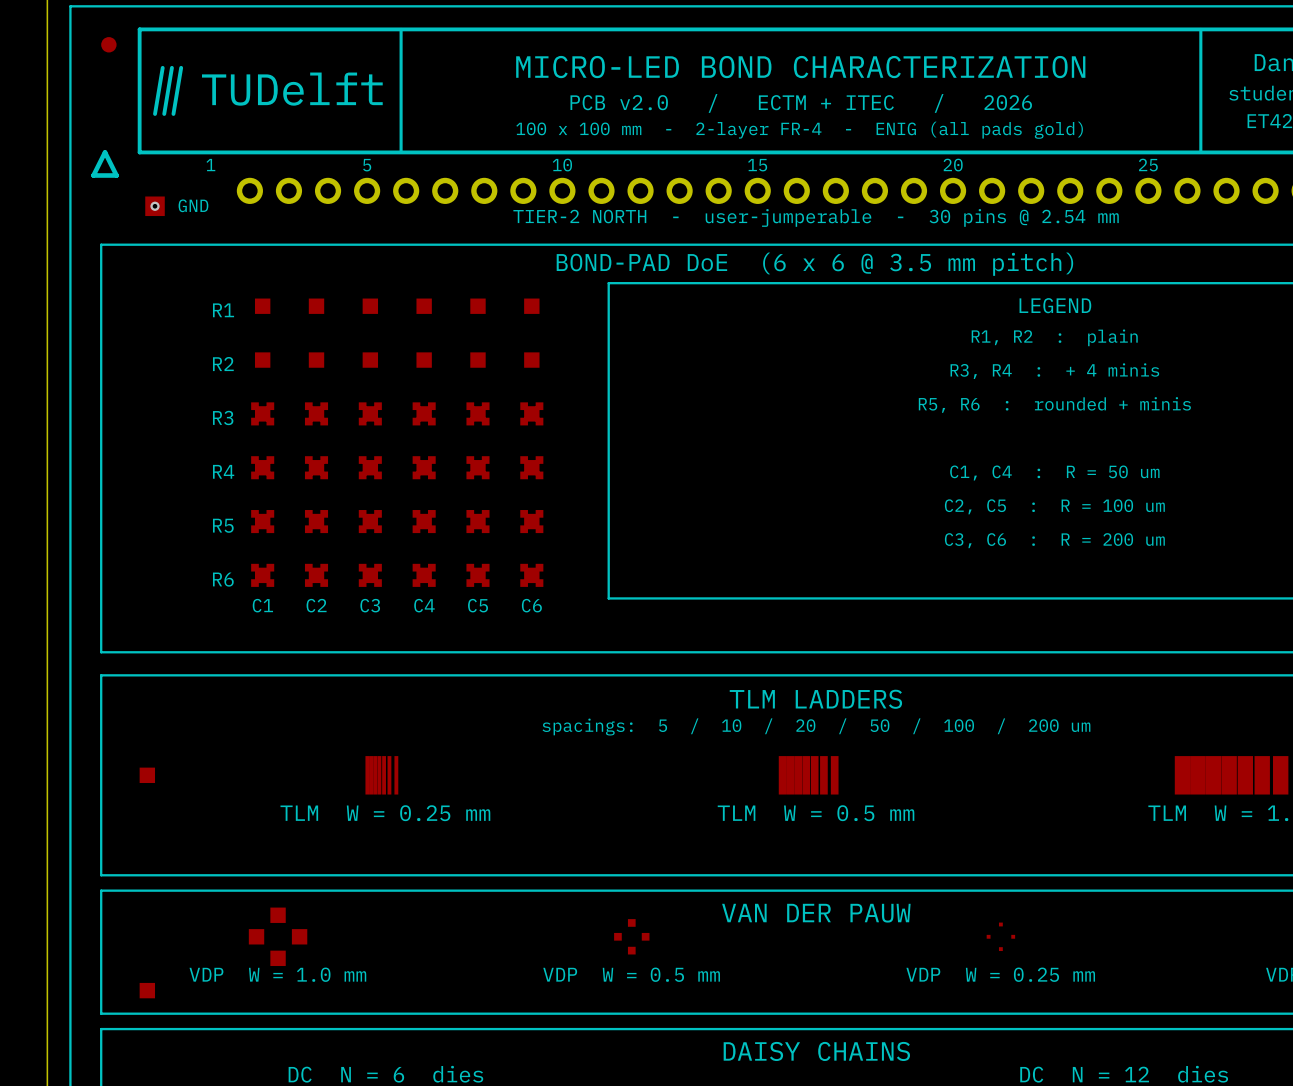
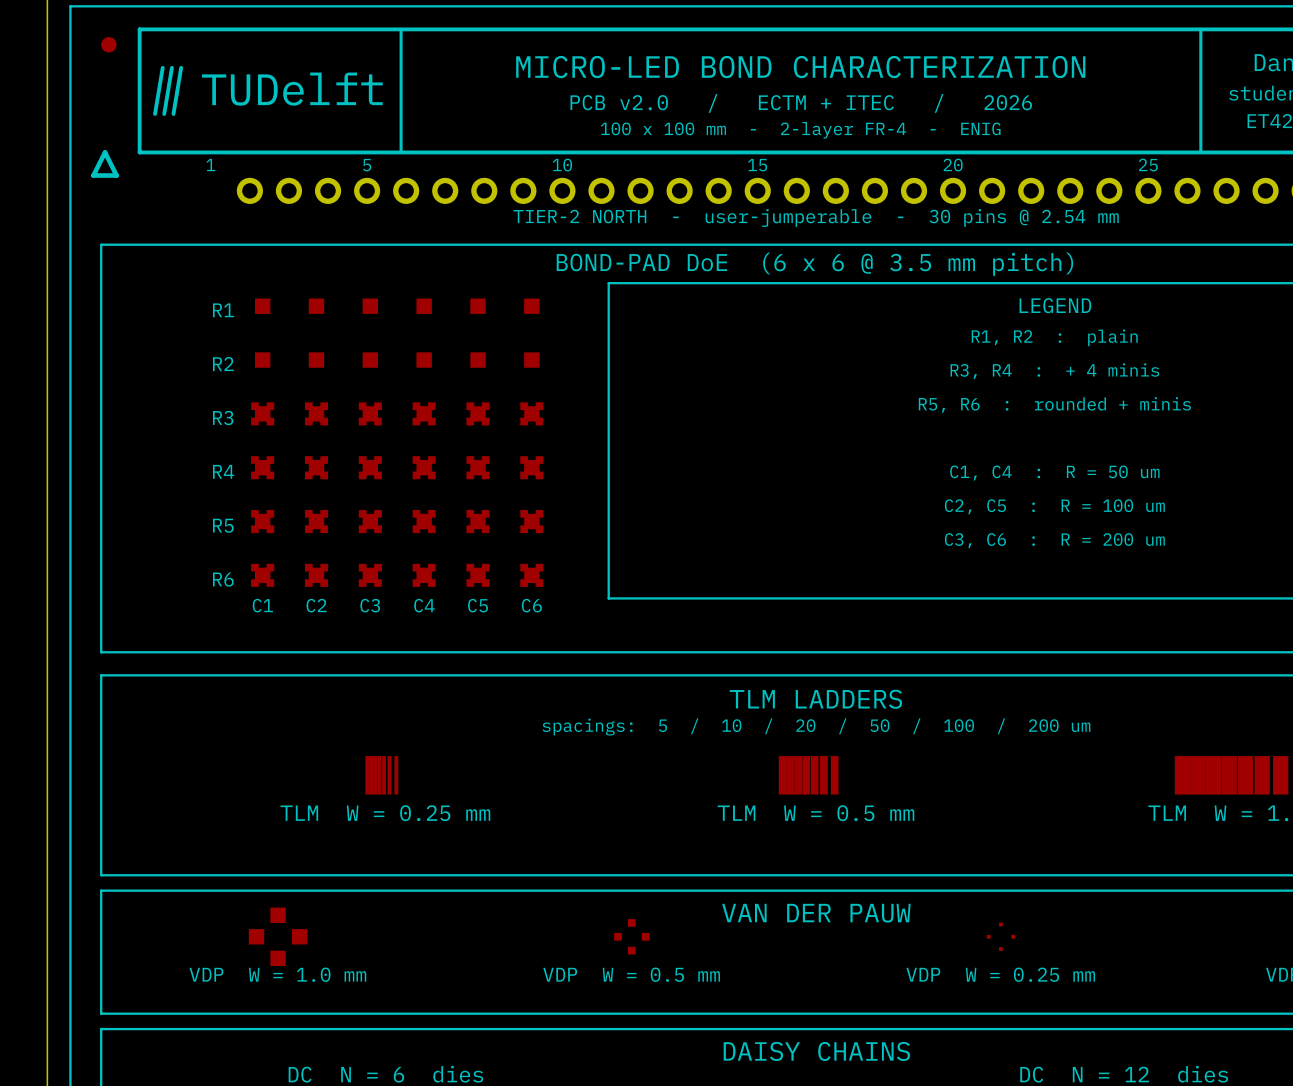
text: 100 x 100 mm - 2-layer FR-4 - ENIG (all pads gold) (799, 130) -> 100 x 100 mm - 2-layer FR-4 - ENIG (800, 130)
text: GND (193, 205) -> none
part: (155, 206) -> none
via: (155, 206) -> none
part: (147, 775) -> none
part: (147, 990) -> none

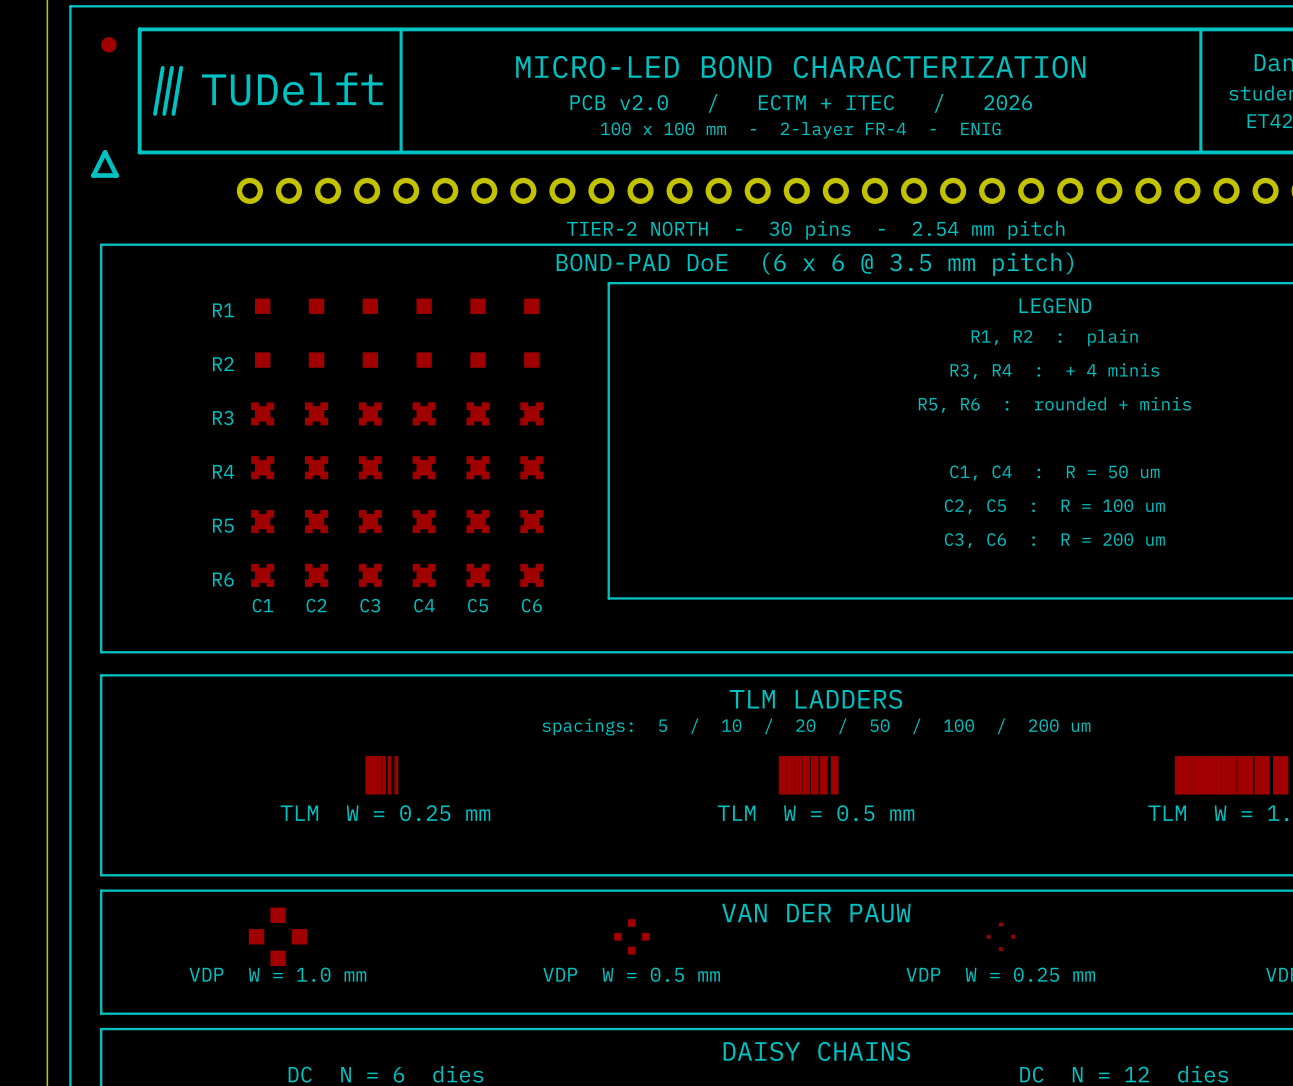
text: 1 (210, 165) -> none
text: 5 (367, 165) -> none
text: 10 (562, 165) -> none
text: 15 (757, 165) -> none
text: 20 (953, 165) -> none
text: 25 (1148, 165) -> none
text: TIER-2 NORTH - user-jumperable - 30 pins @ 2.54 mm (816, 217) -> TIER-2 NORTH - 30 pins - 2.54 mm pitch (815, 230)

